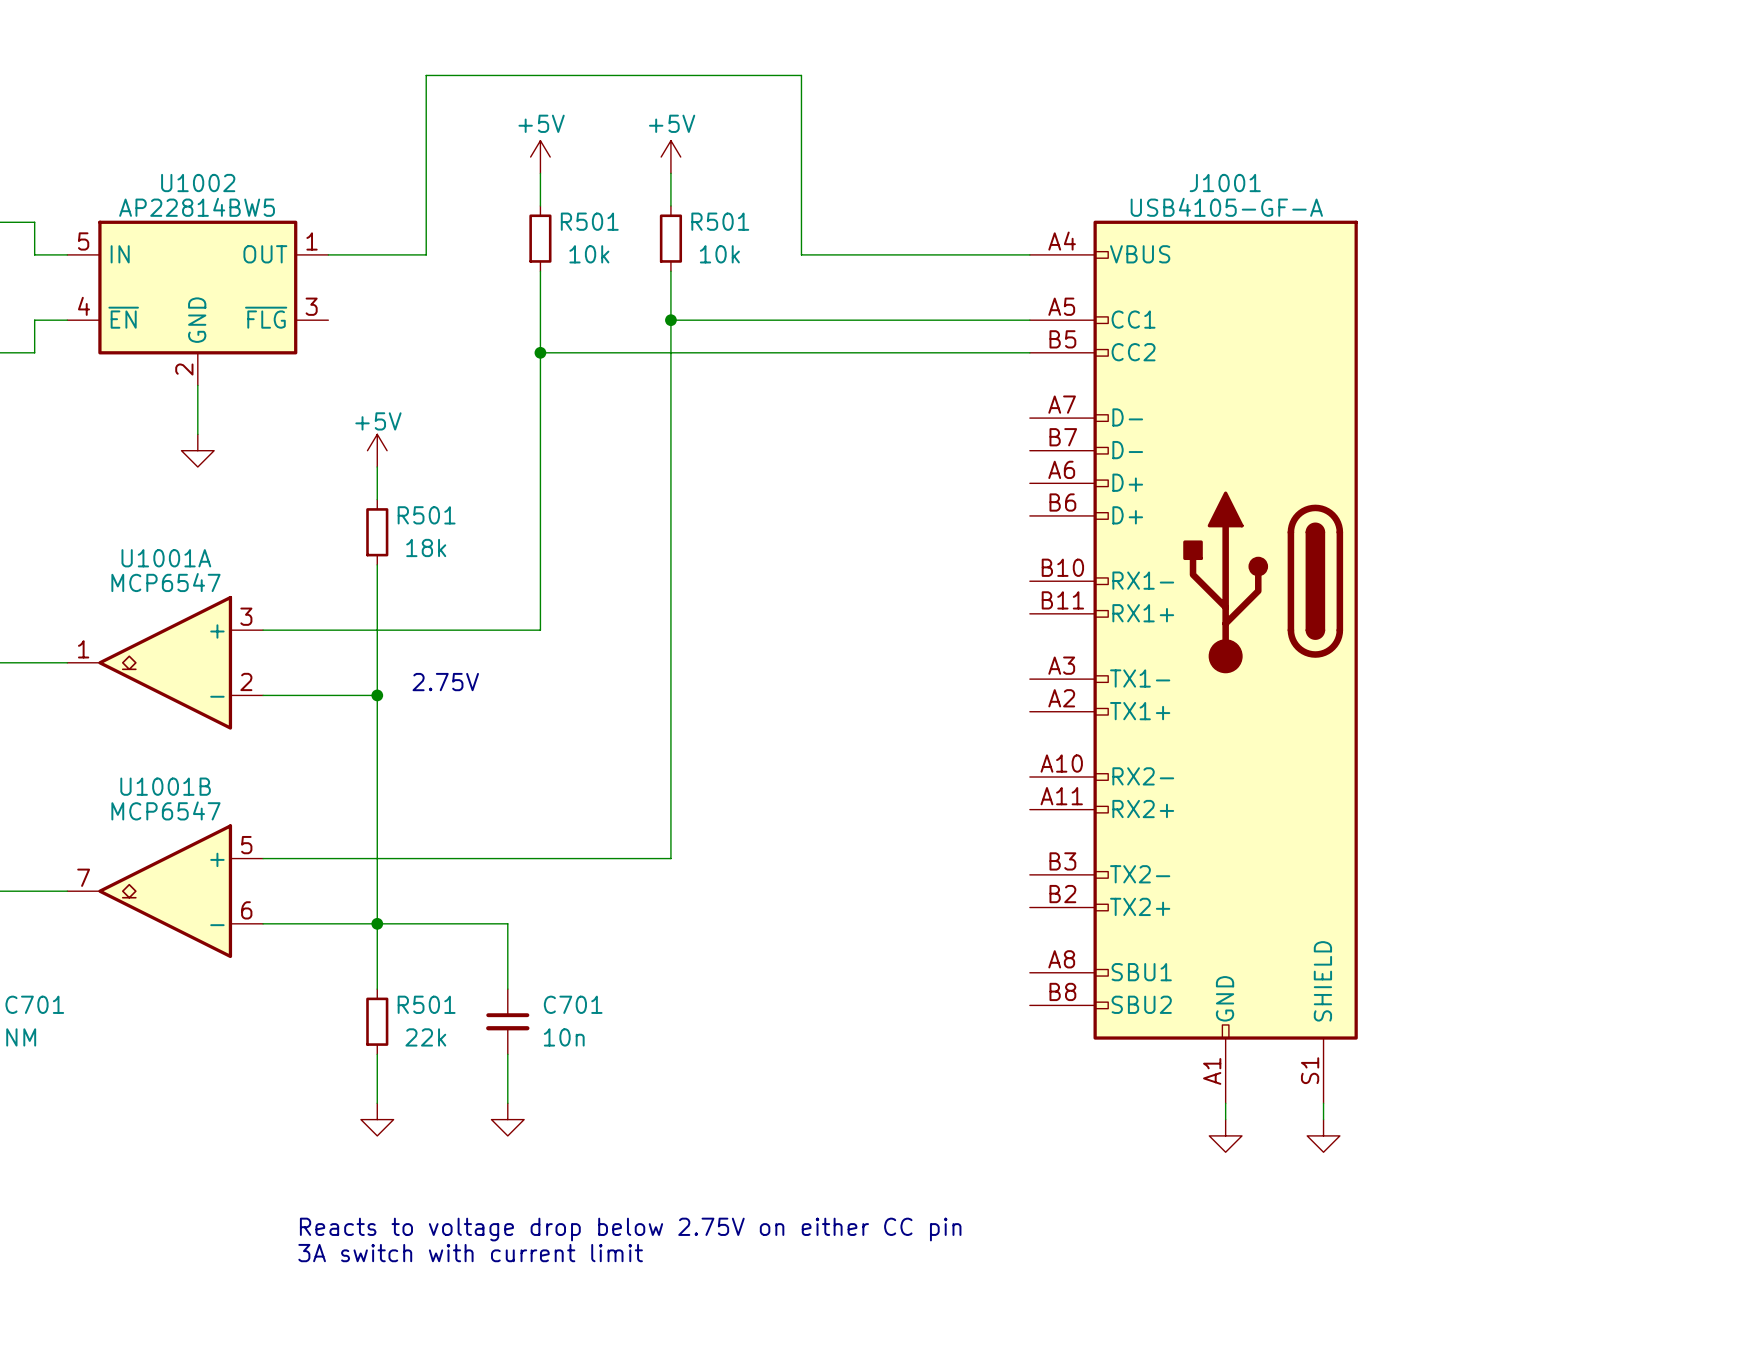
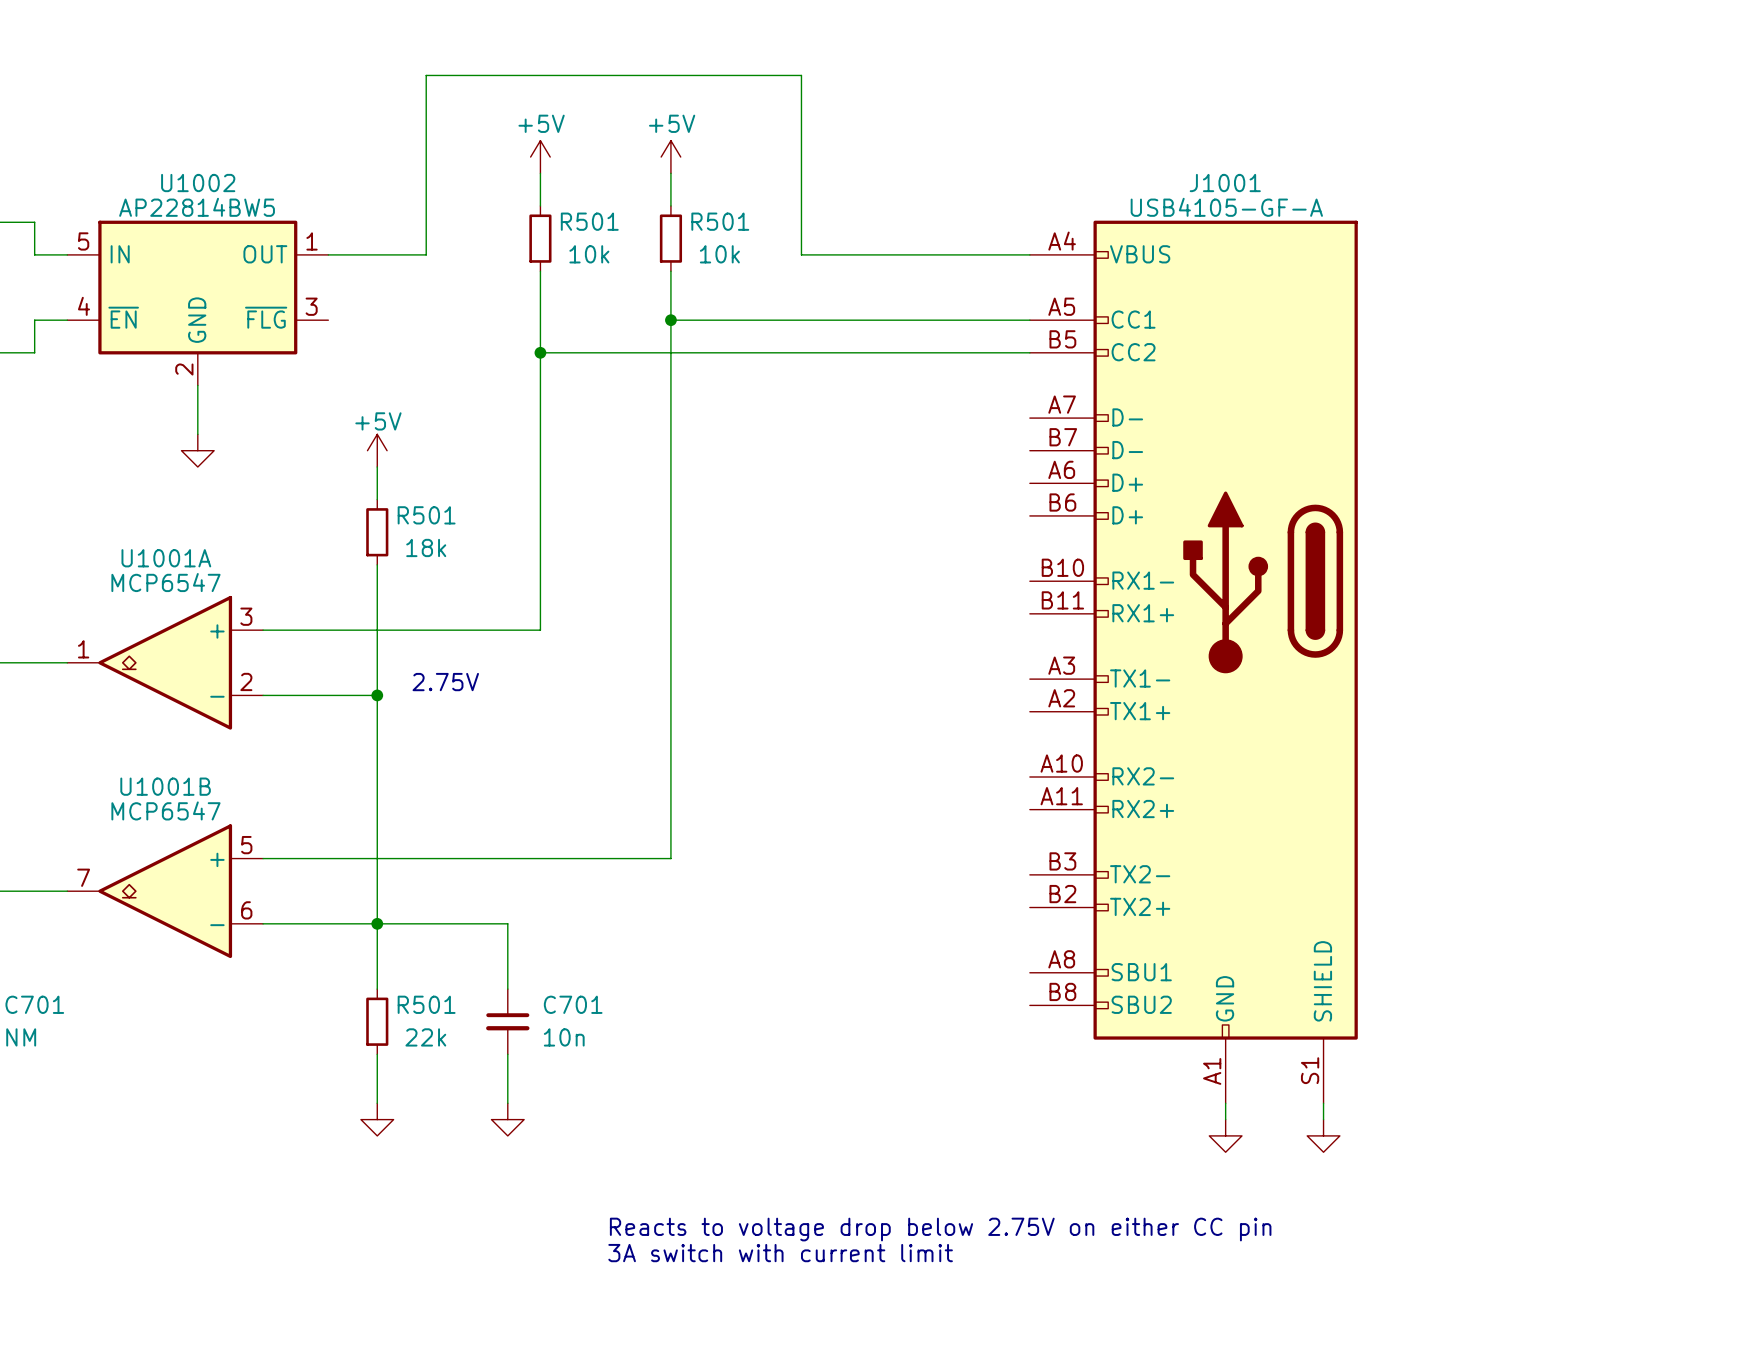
text position: Reacts to voltage drop below 2.75V on either CC pin (630, 1229) -> Reacts to voltage drop below 2.75V on either CC pin (940, 1229)
text position: 3A switch with current limit (470, 1253) -> 3A switch with current limit (780, 1253)

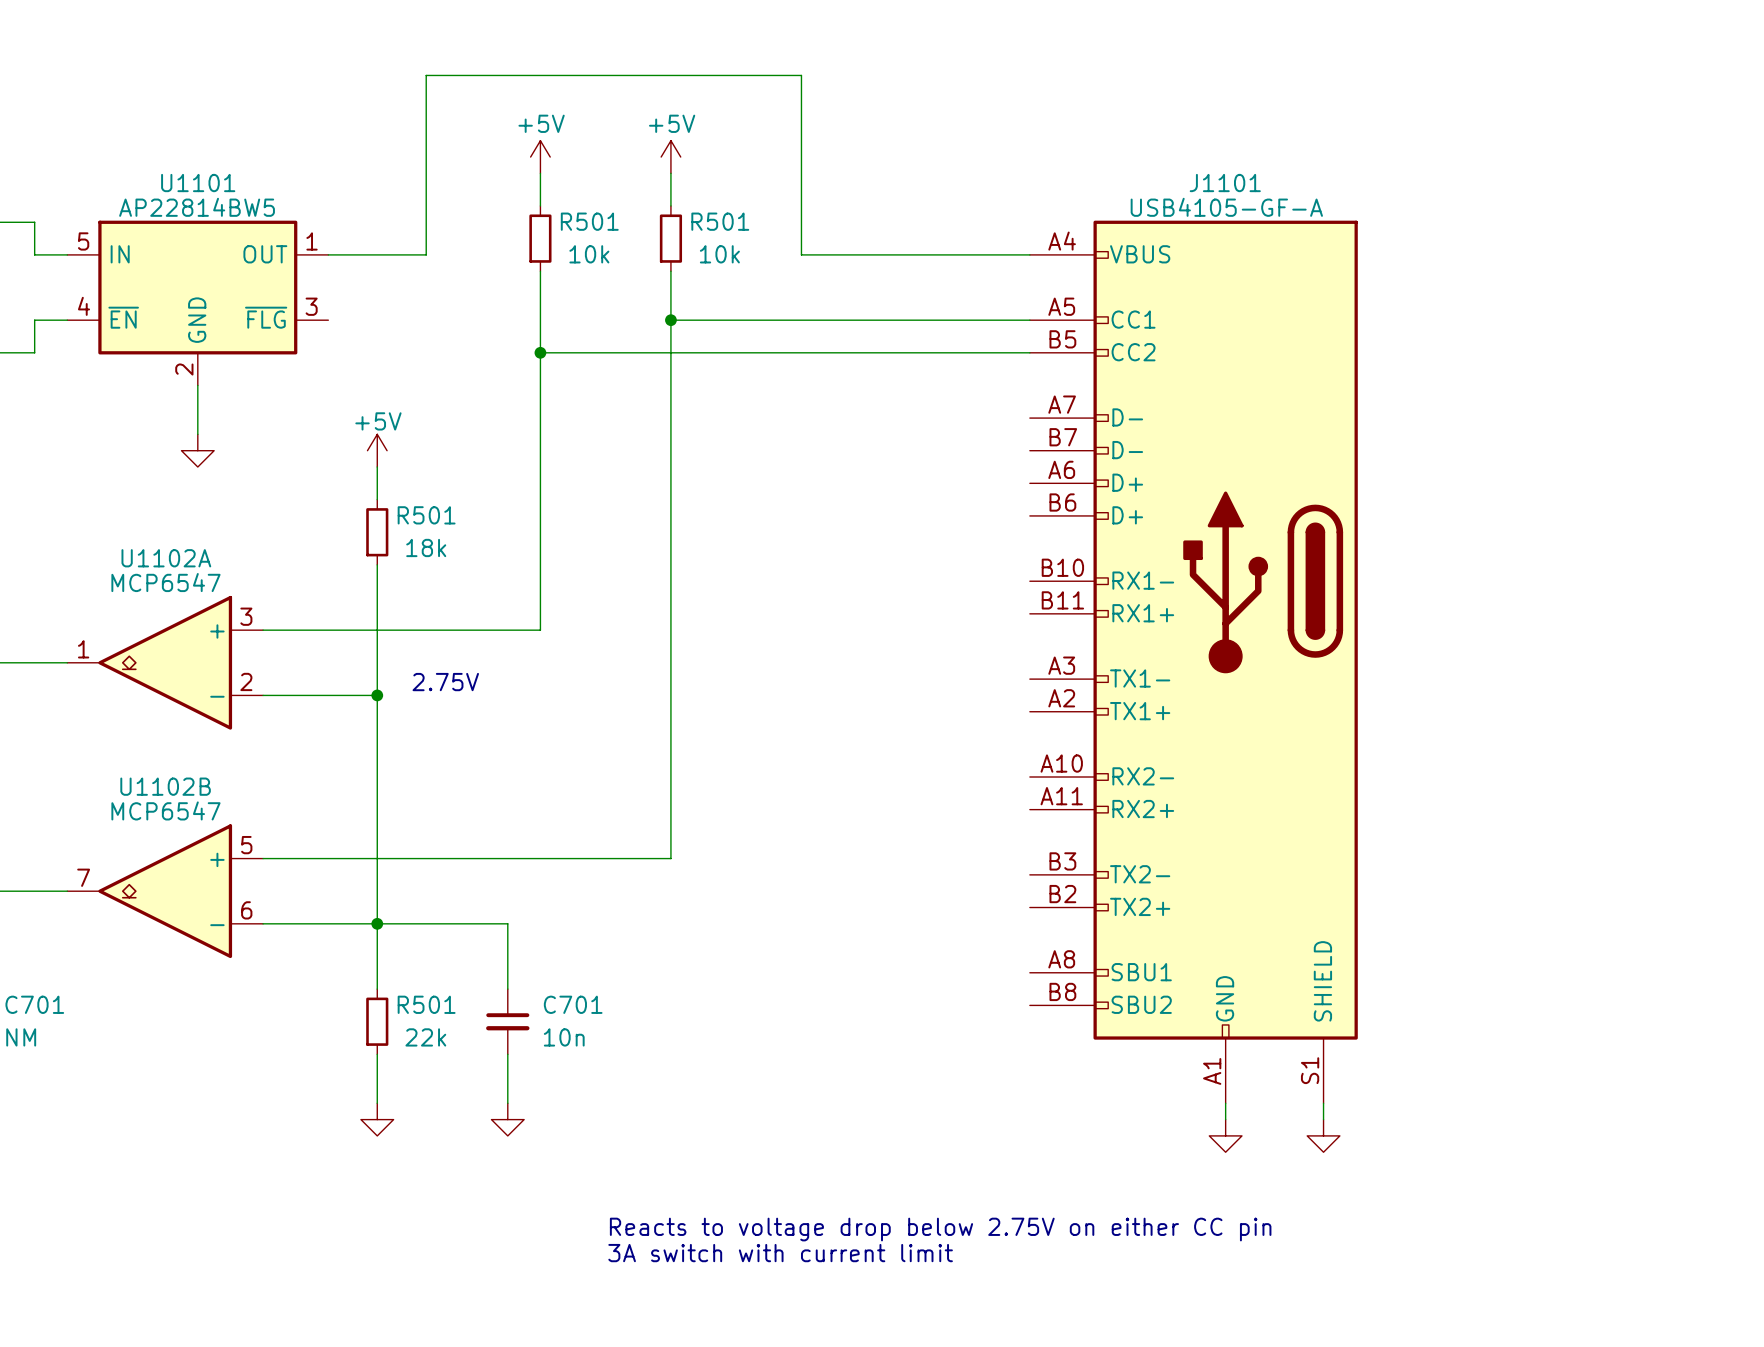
U1002 name: U1002 (198, 183) -> U1101 (198, 183)
J1001 name: J1001 (1225, 183) -> J1101 (1225, 183)
U1001A name: U1001A (166, 558) -> U1102A (166, 558)
U1001B name: U1001B (165, 786) -> U1102B (165, 786)

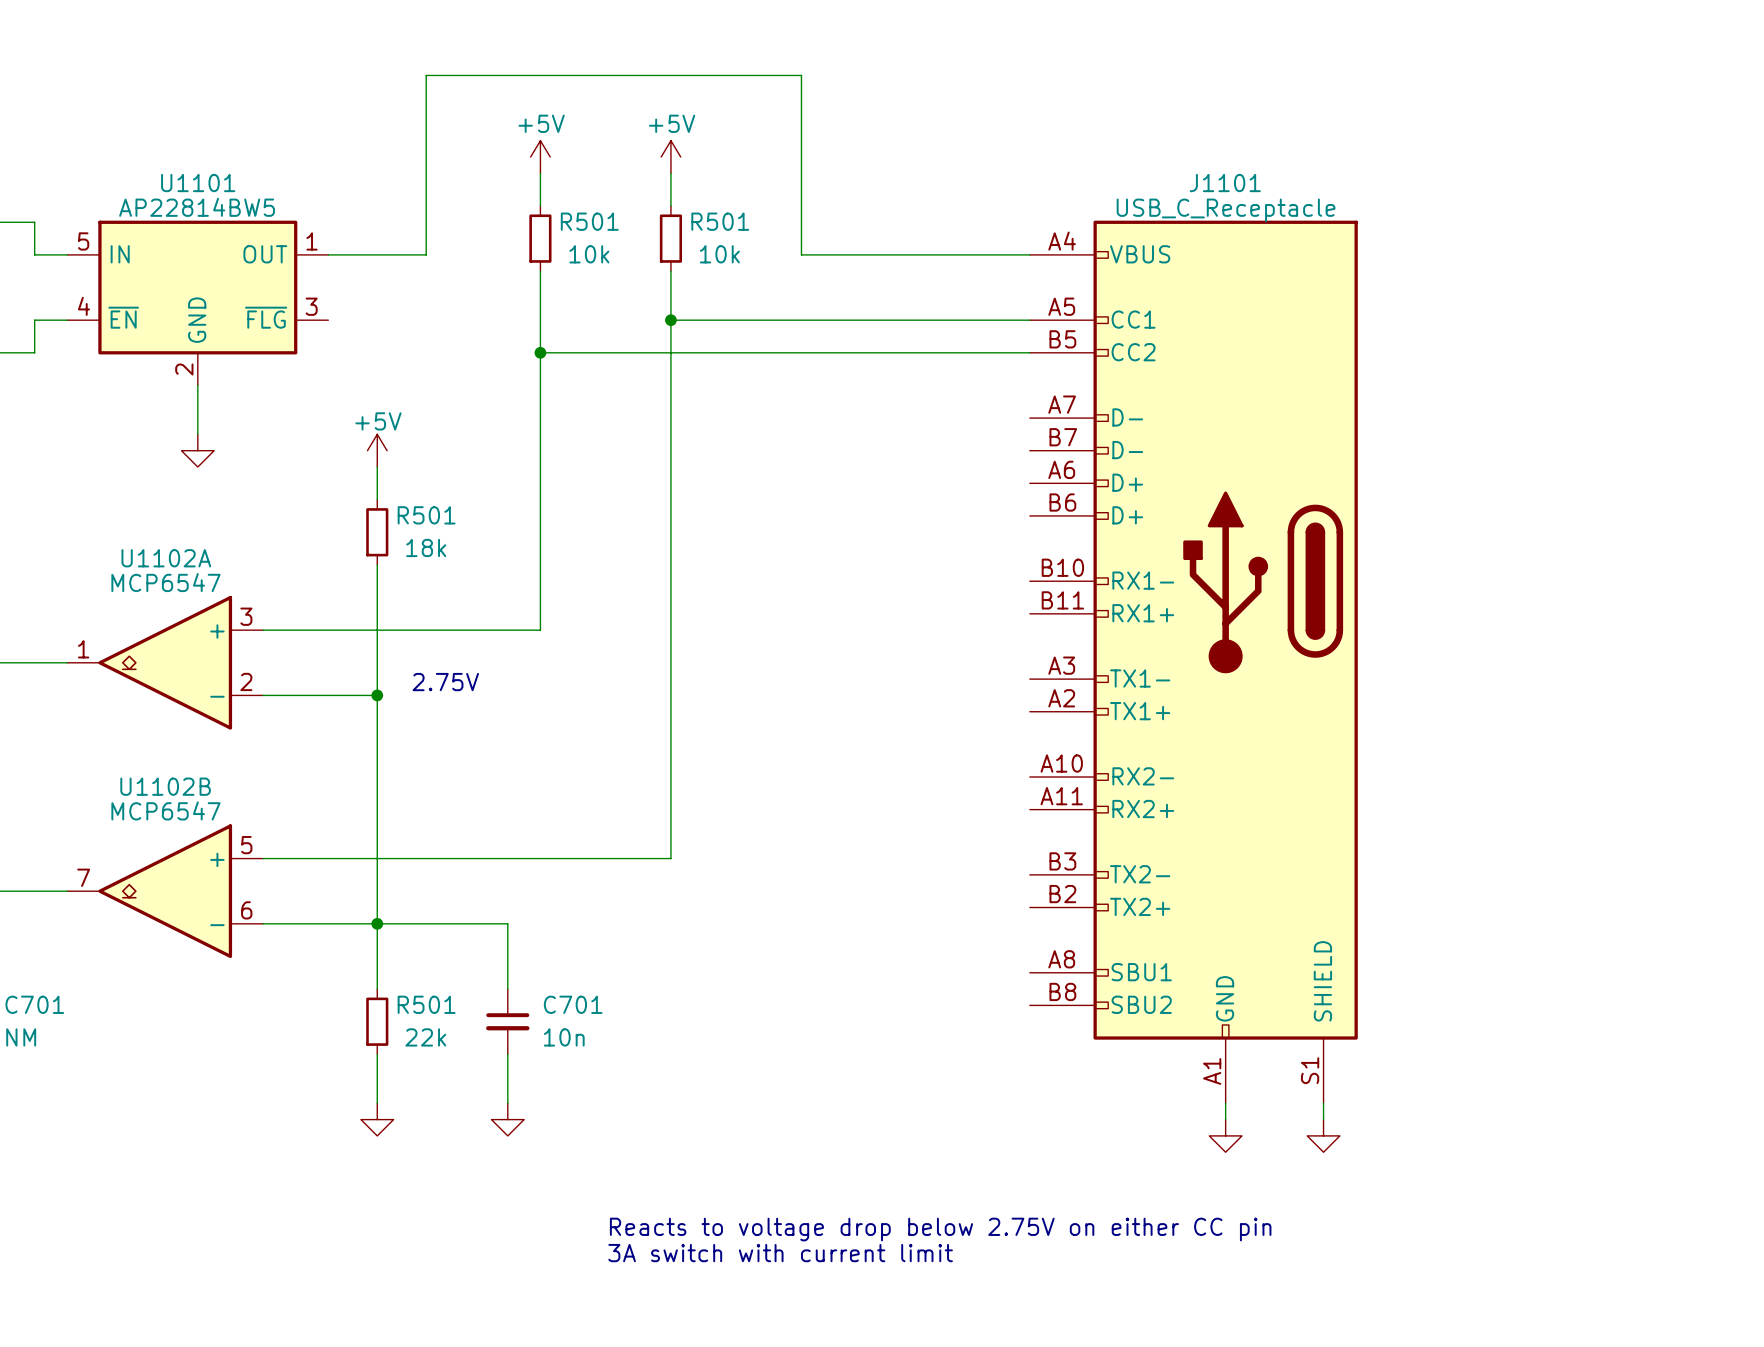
J1101 value: USB4105-GF-A (1226, 207) -> USB_C_Receptacle (1226, 210)

